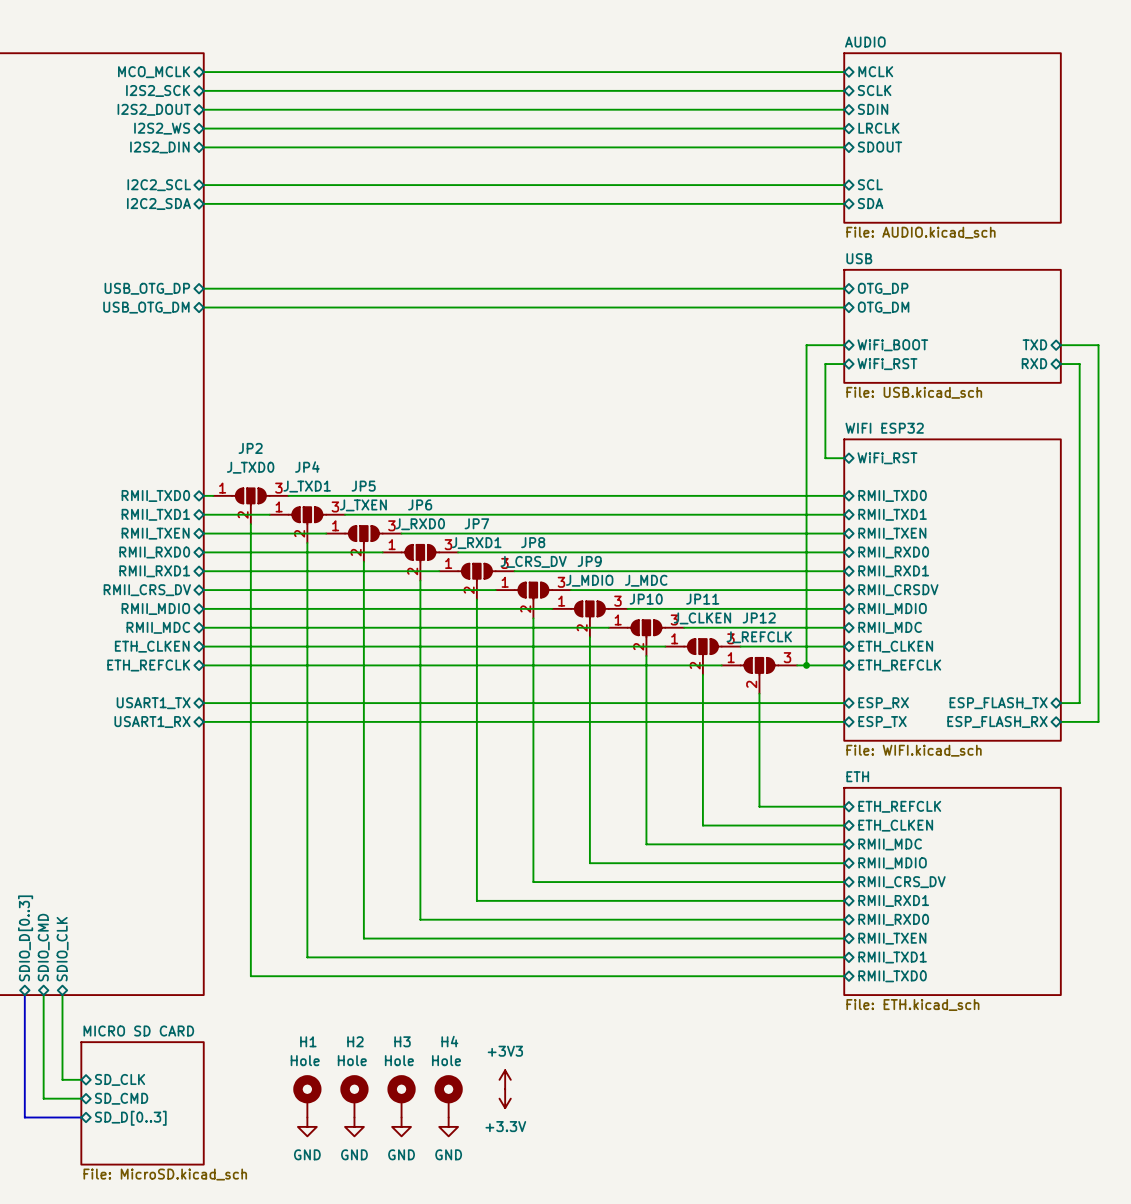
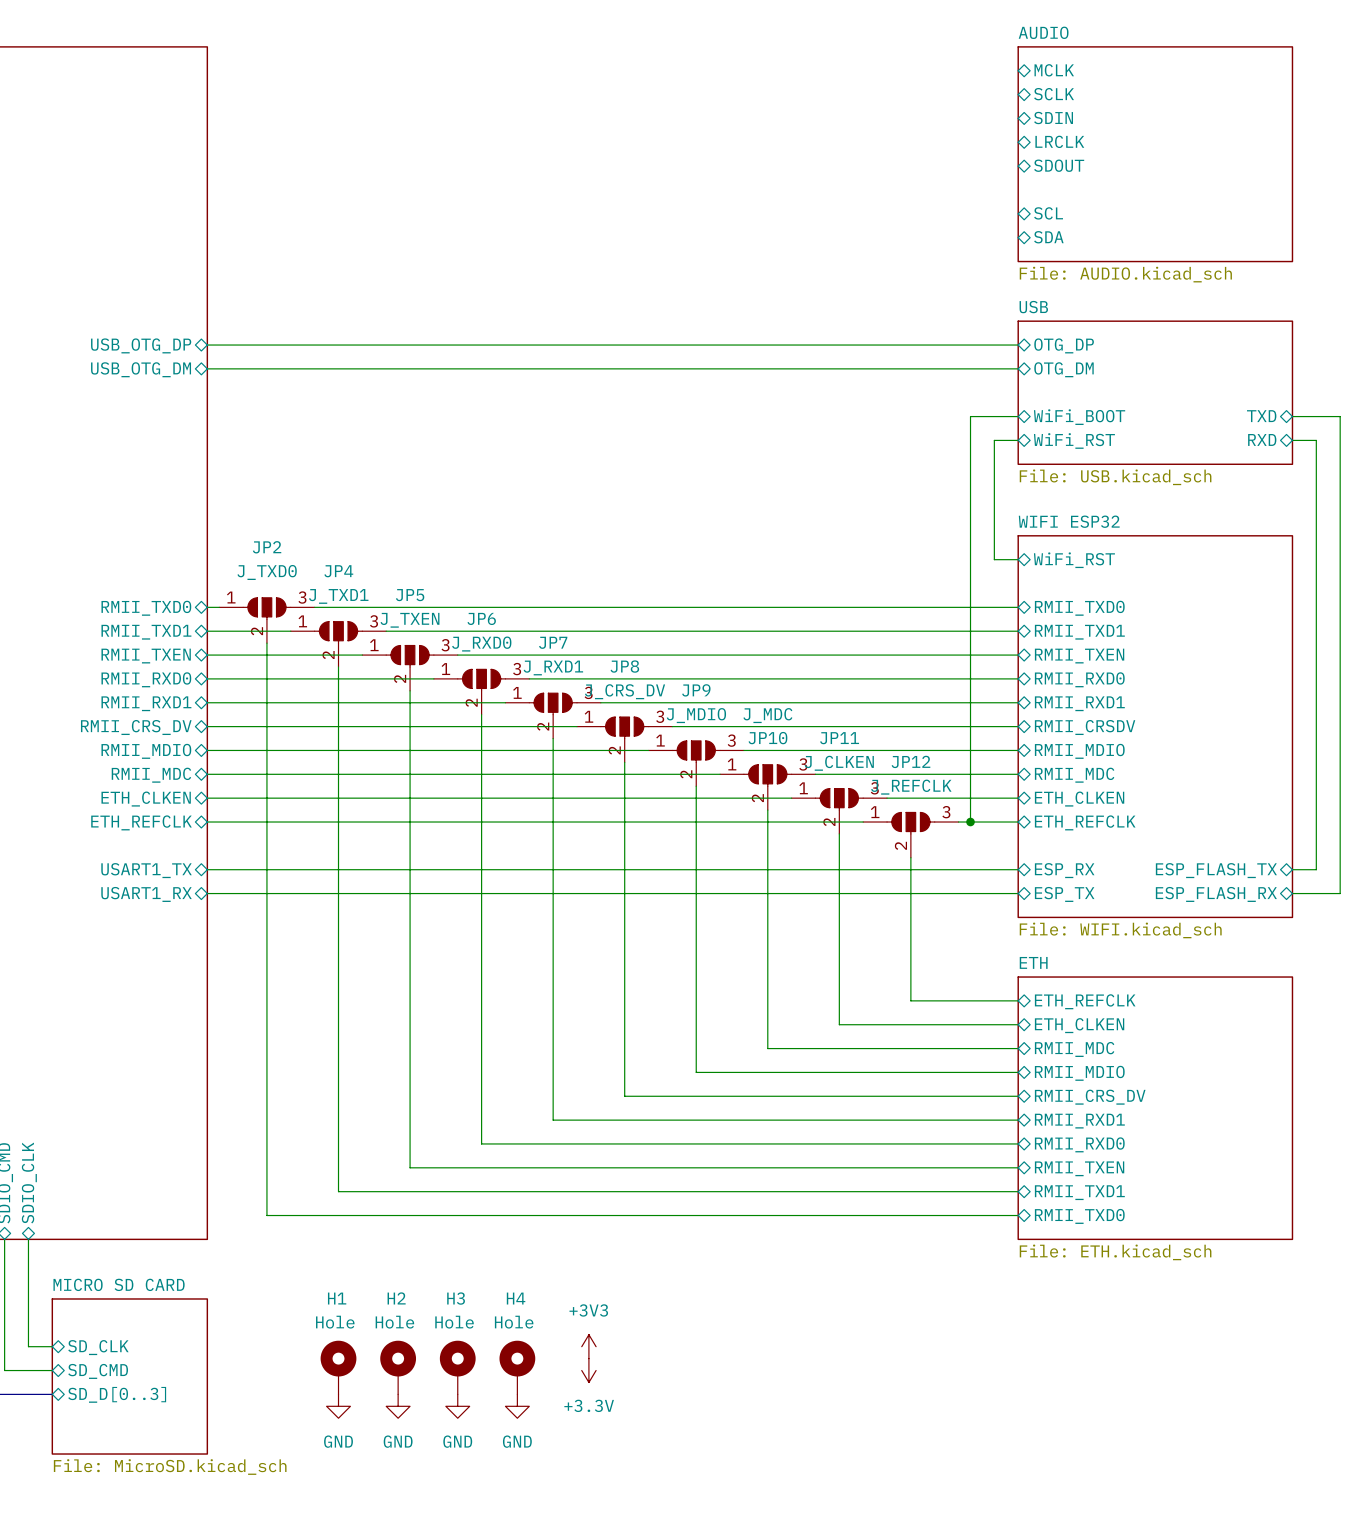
sheet pin: MCO_MCLK (154, 72) -> none
wire: (203, 72) (844, 72) -> none
sheet pin: I2S2_SCK (158, 90) -> none
wire: (203, 90) (844, 90) -> none
sheet pin: I2S2_DOUT (154, 109) -> none
wire: (203, 109) (844, 109) -> none
sheet pin: I2S2_WS (162, 128) -> none
wire: (203, 128) (844, 128) -> none
sheet pin: I2S2_DIN (159, 147) -> none
wire: (203, 147) (844, 147) -> none
sheet pin: I2C2_SCL (159, 185) -> none
wire: (203, 185) (844, 185) -> none
wire: (203, 203) (844, 203) -> none
sheet pin: I2C2_SDA (158, 204) -> none

